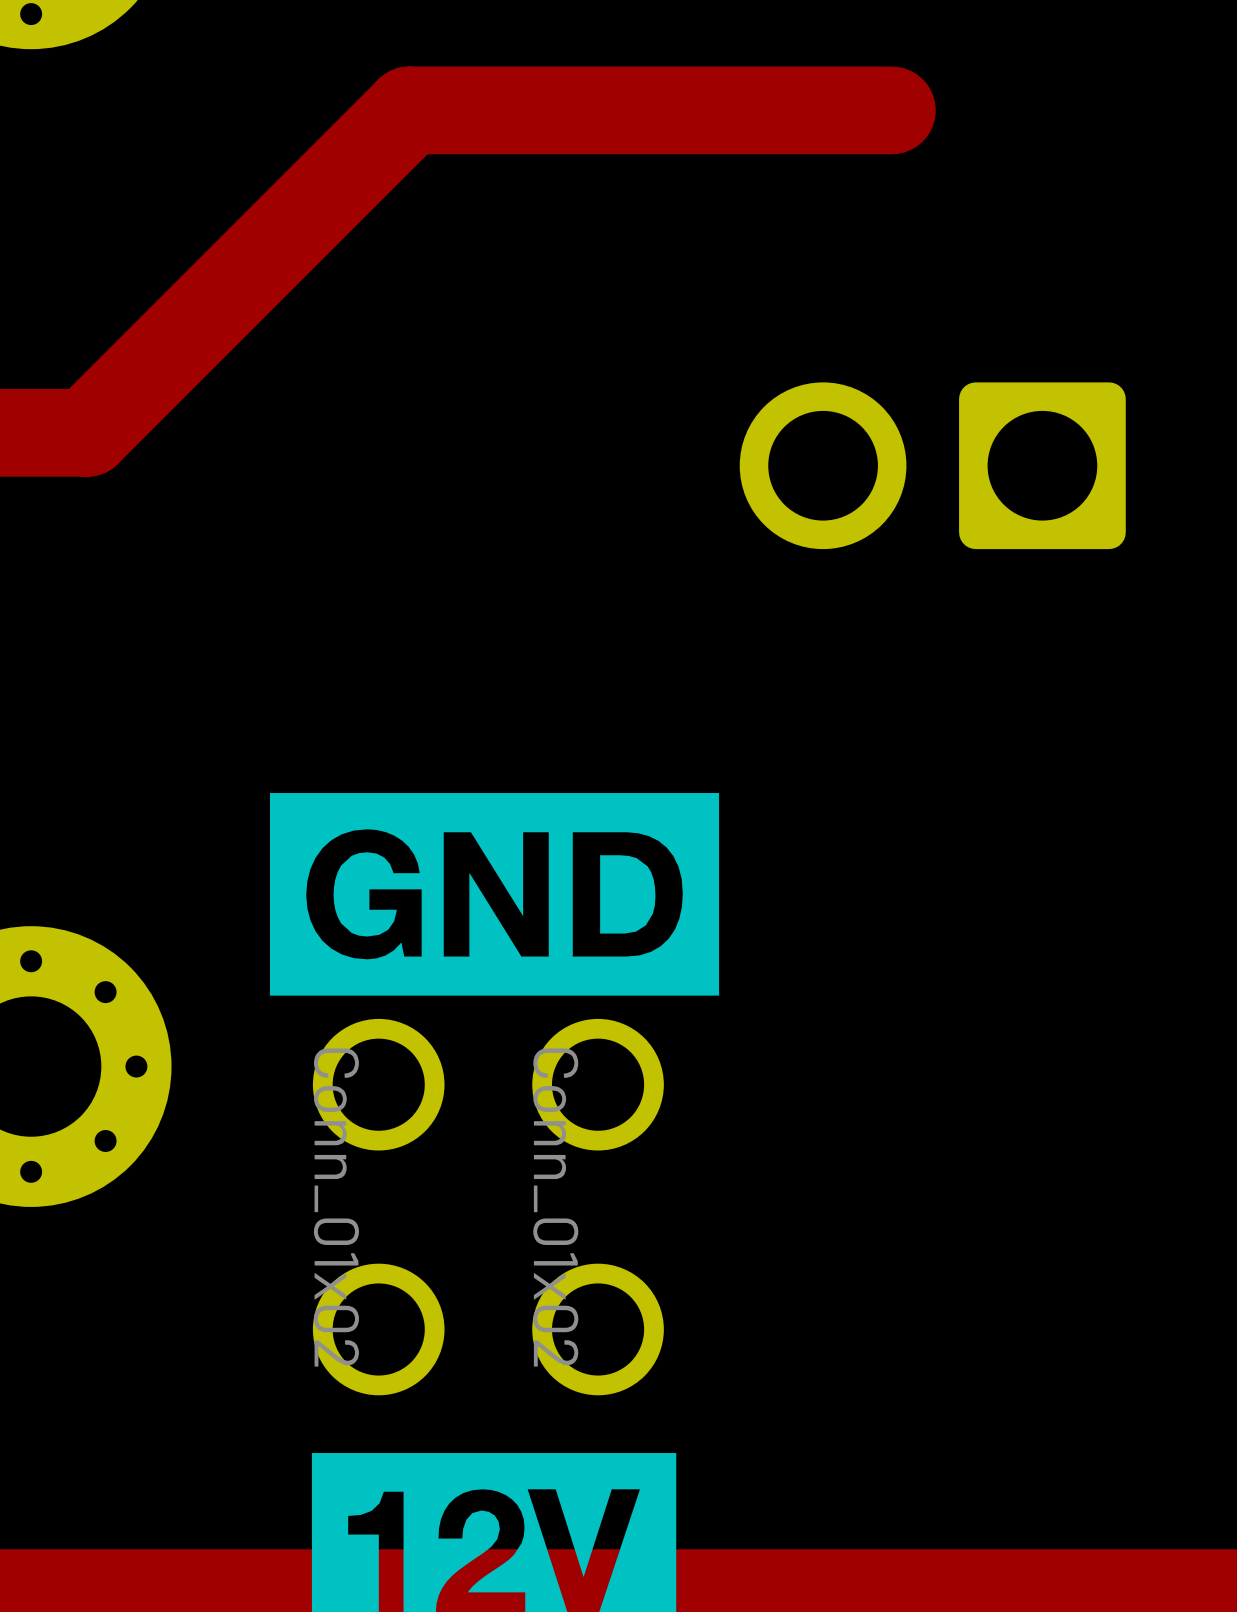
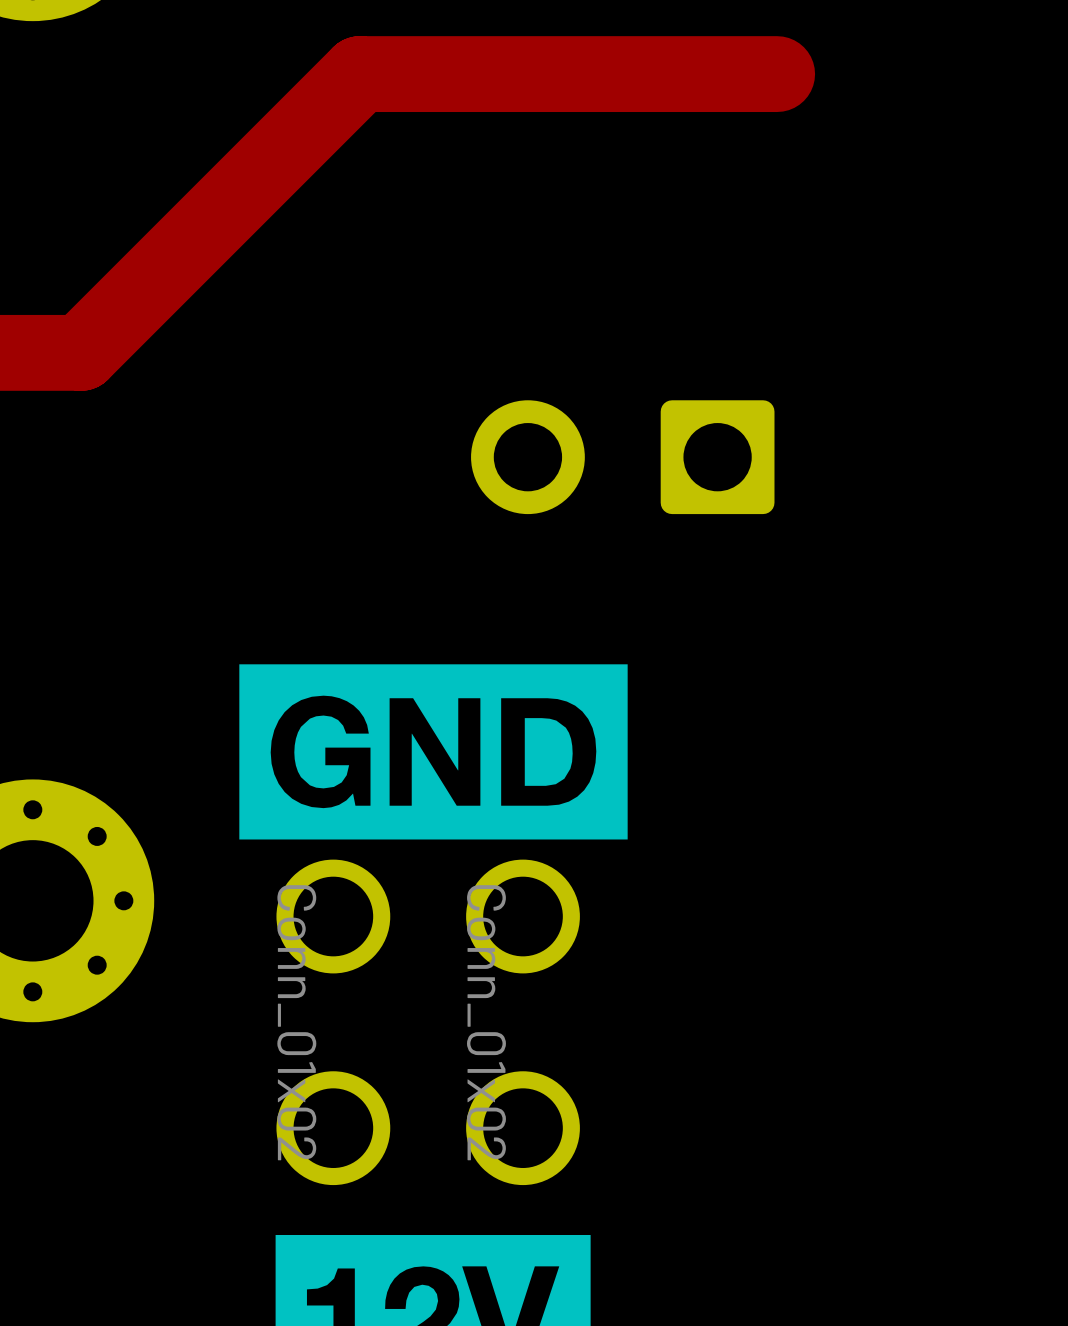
part: (932, 465) -> none
part: none -> (622, 457)

